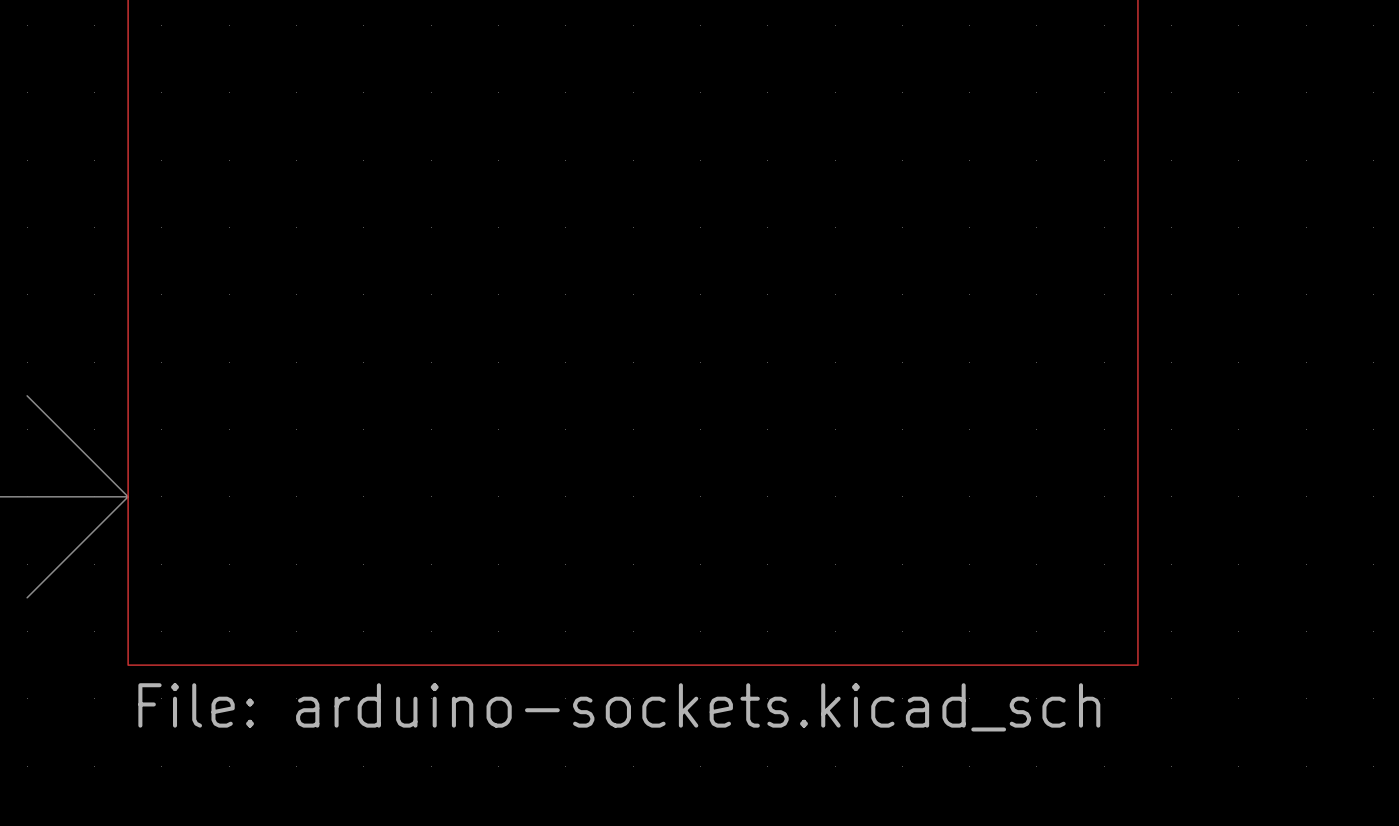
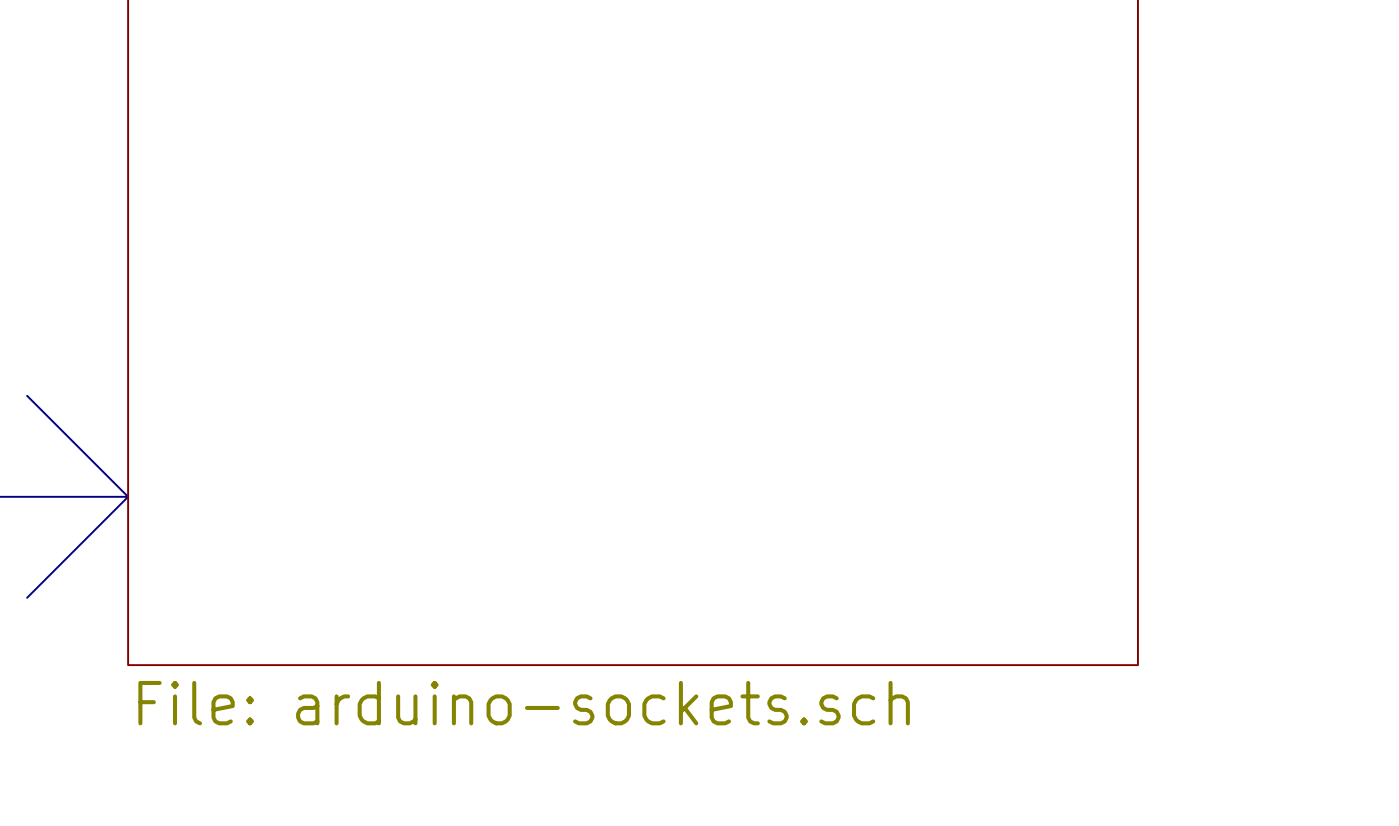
sheet value: File: arduino-sockets.kicad_sch (619, 707) -> File: arduino-sockets.sch (524, 703)

